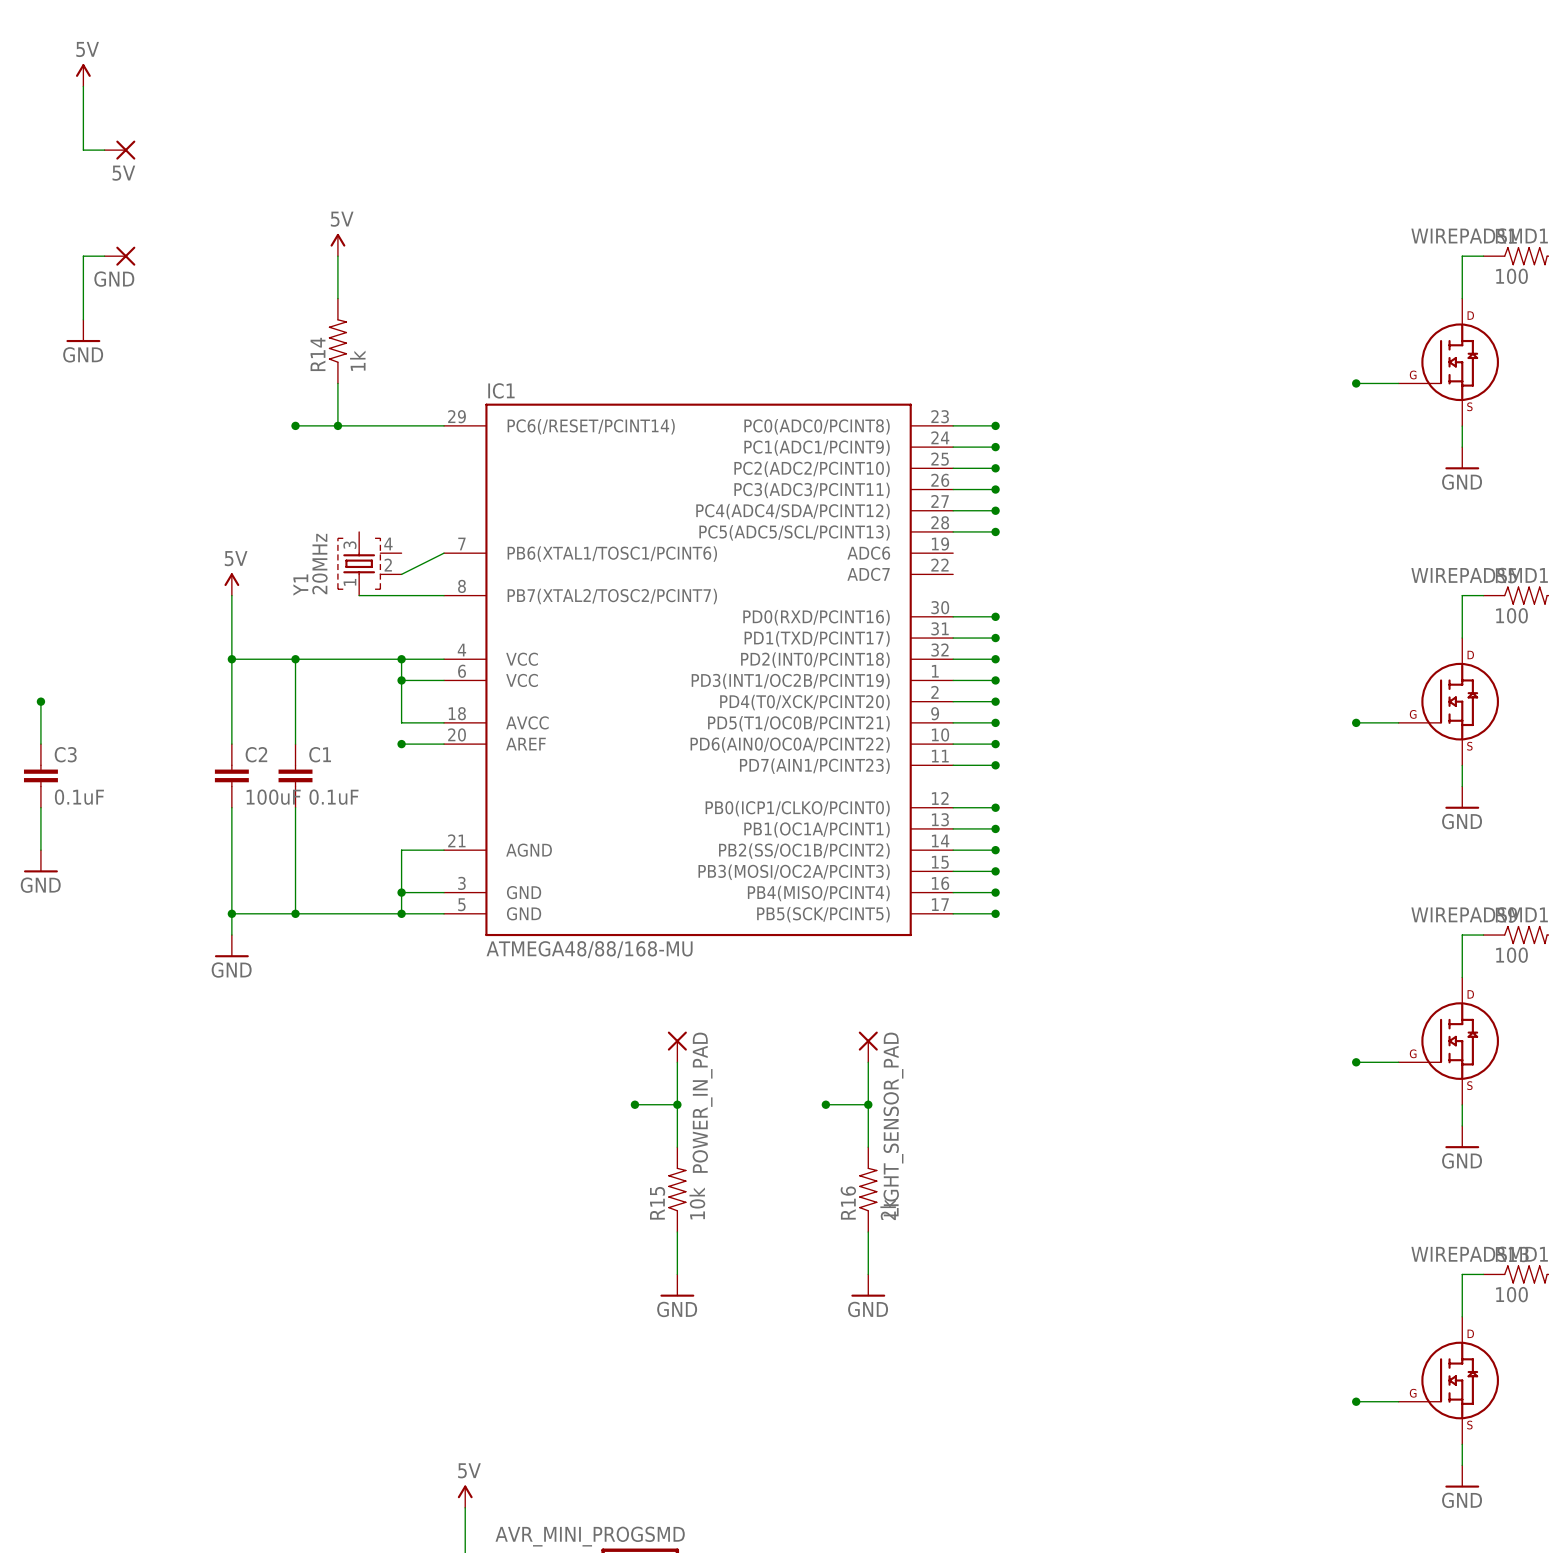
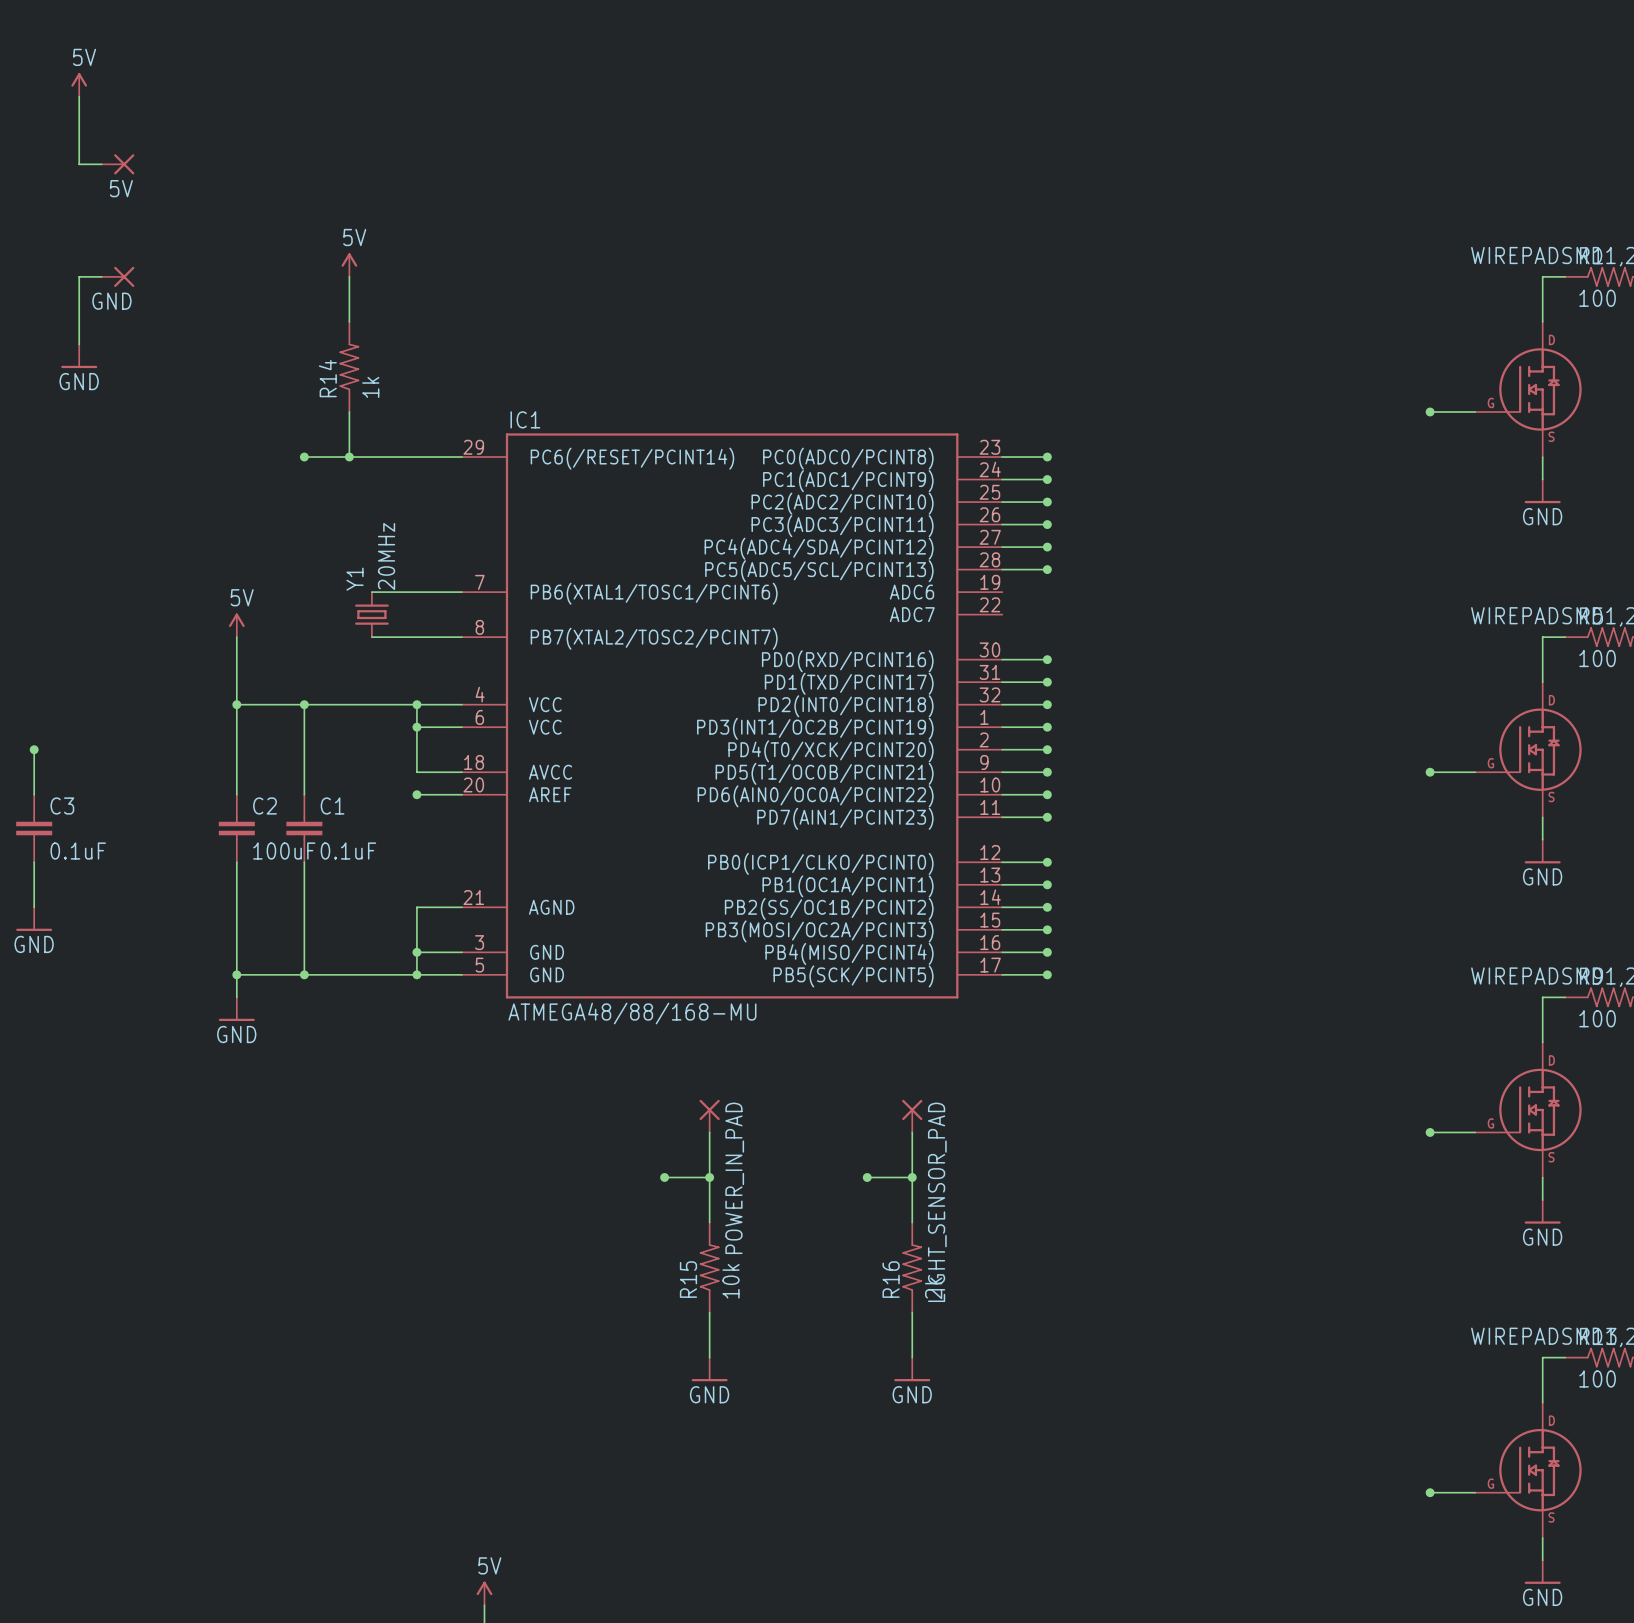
Y1 symbol: [337, 531, 402, 596] -> [355, 591, 389, 638]
wire: (444, 553) (401, 574) -> (461, 592) (371, 592)
Y1 value position: 20MHz (319, 564) -> 20MHz (386, 556)
Y1 name position: Y1 (300, 585) -> Y1 (355, 579)

